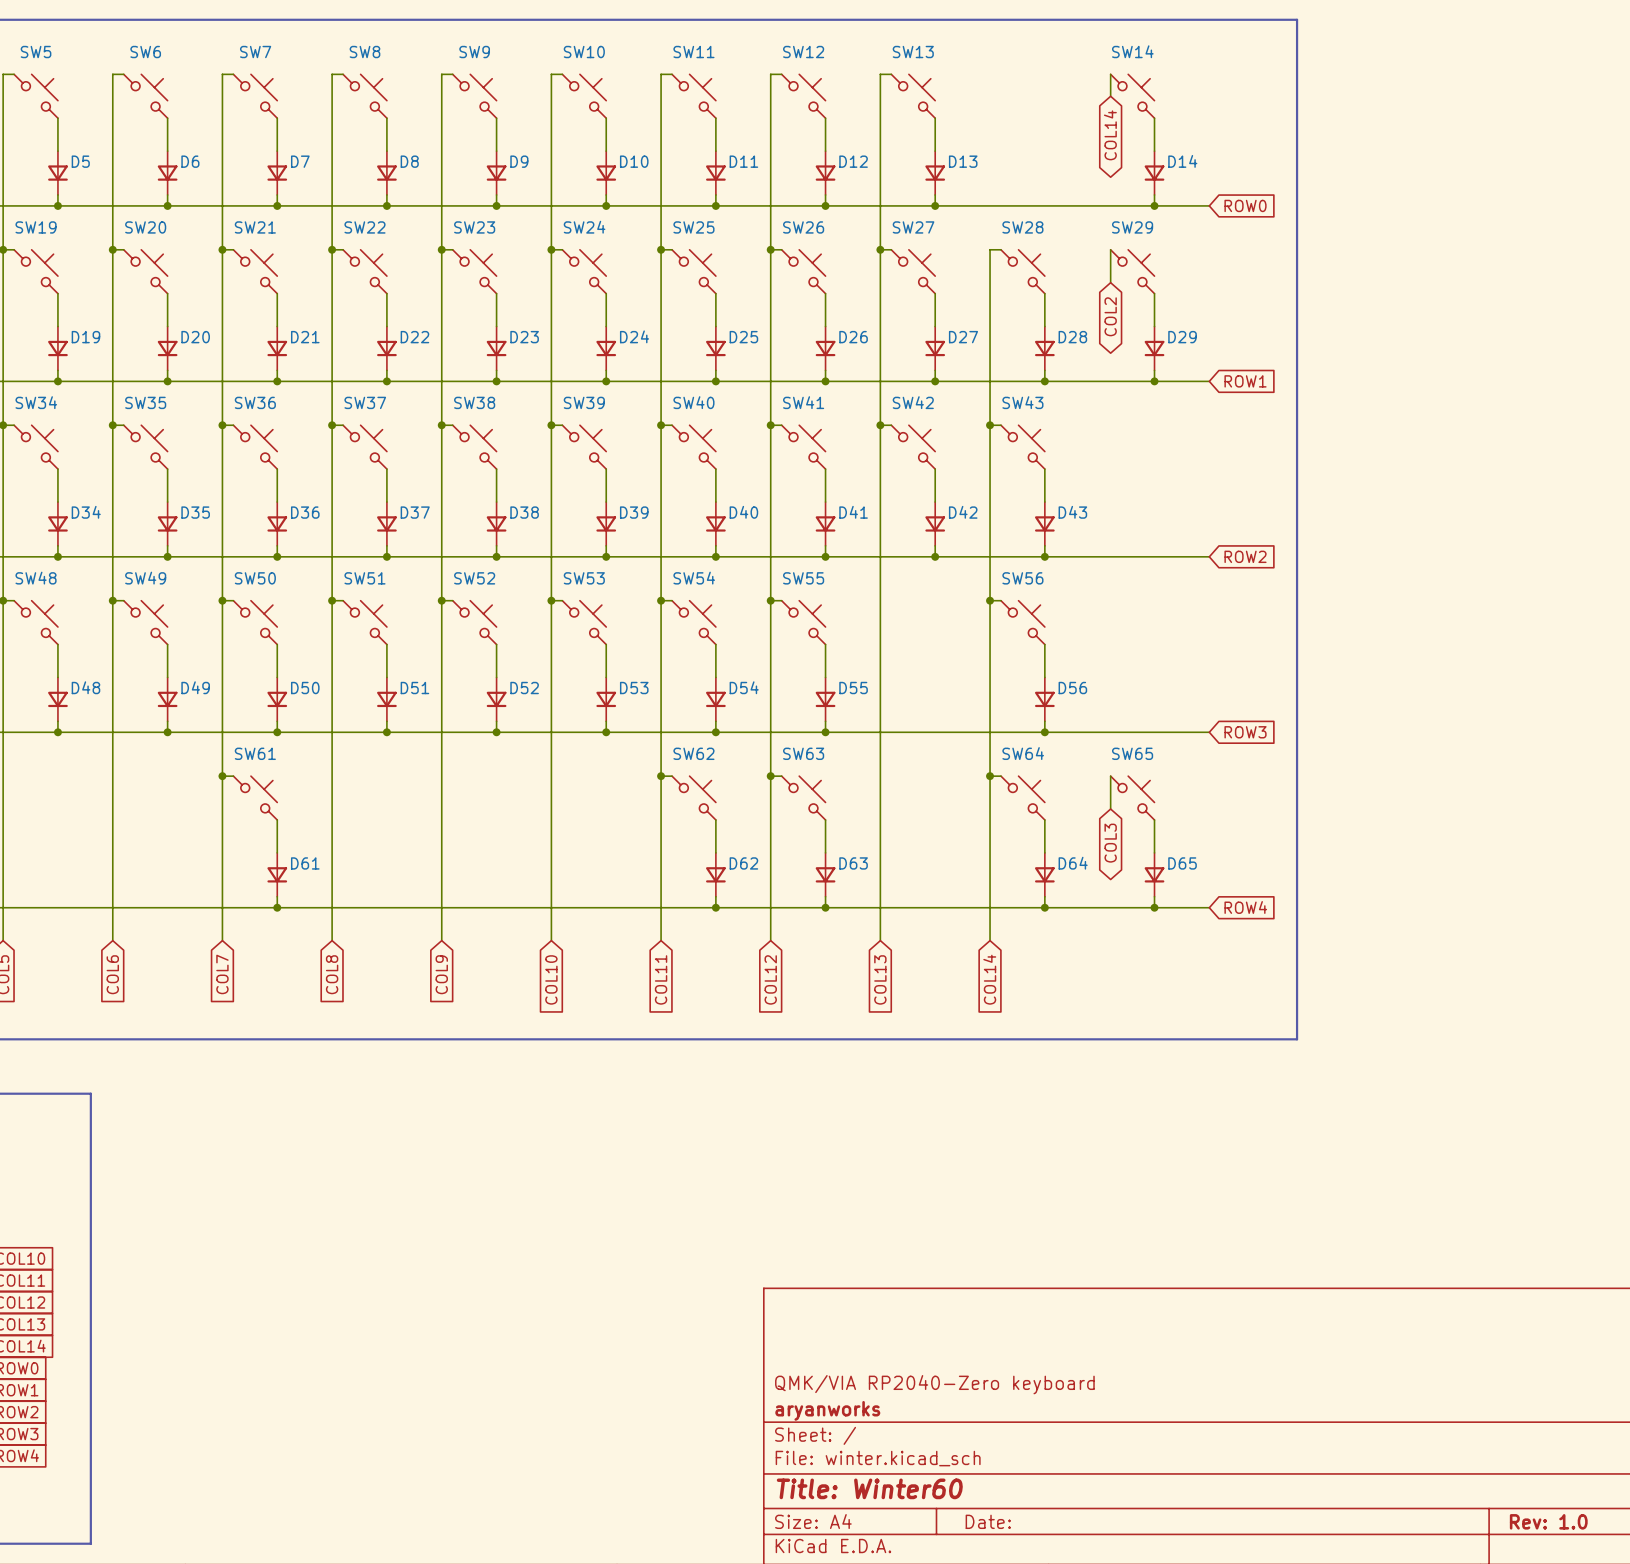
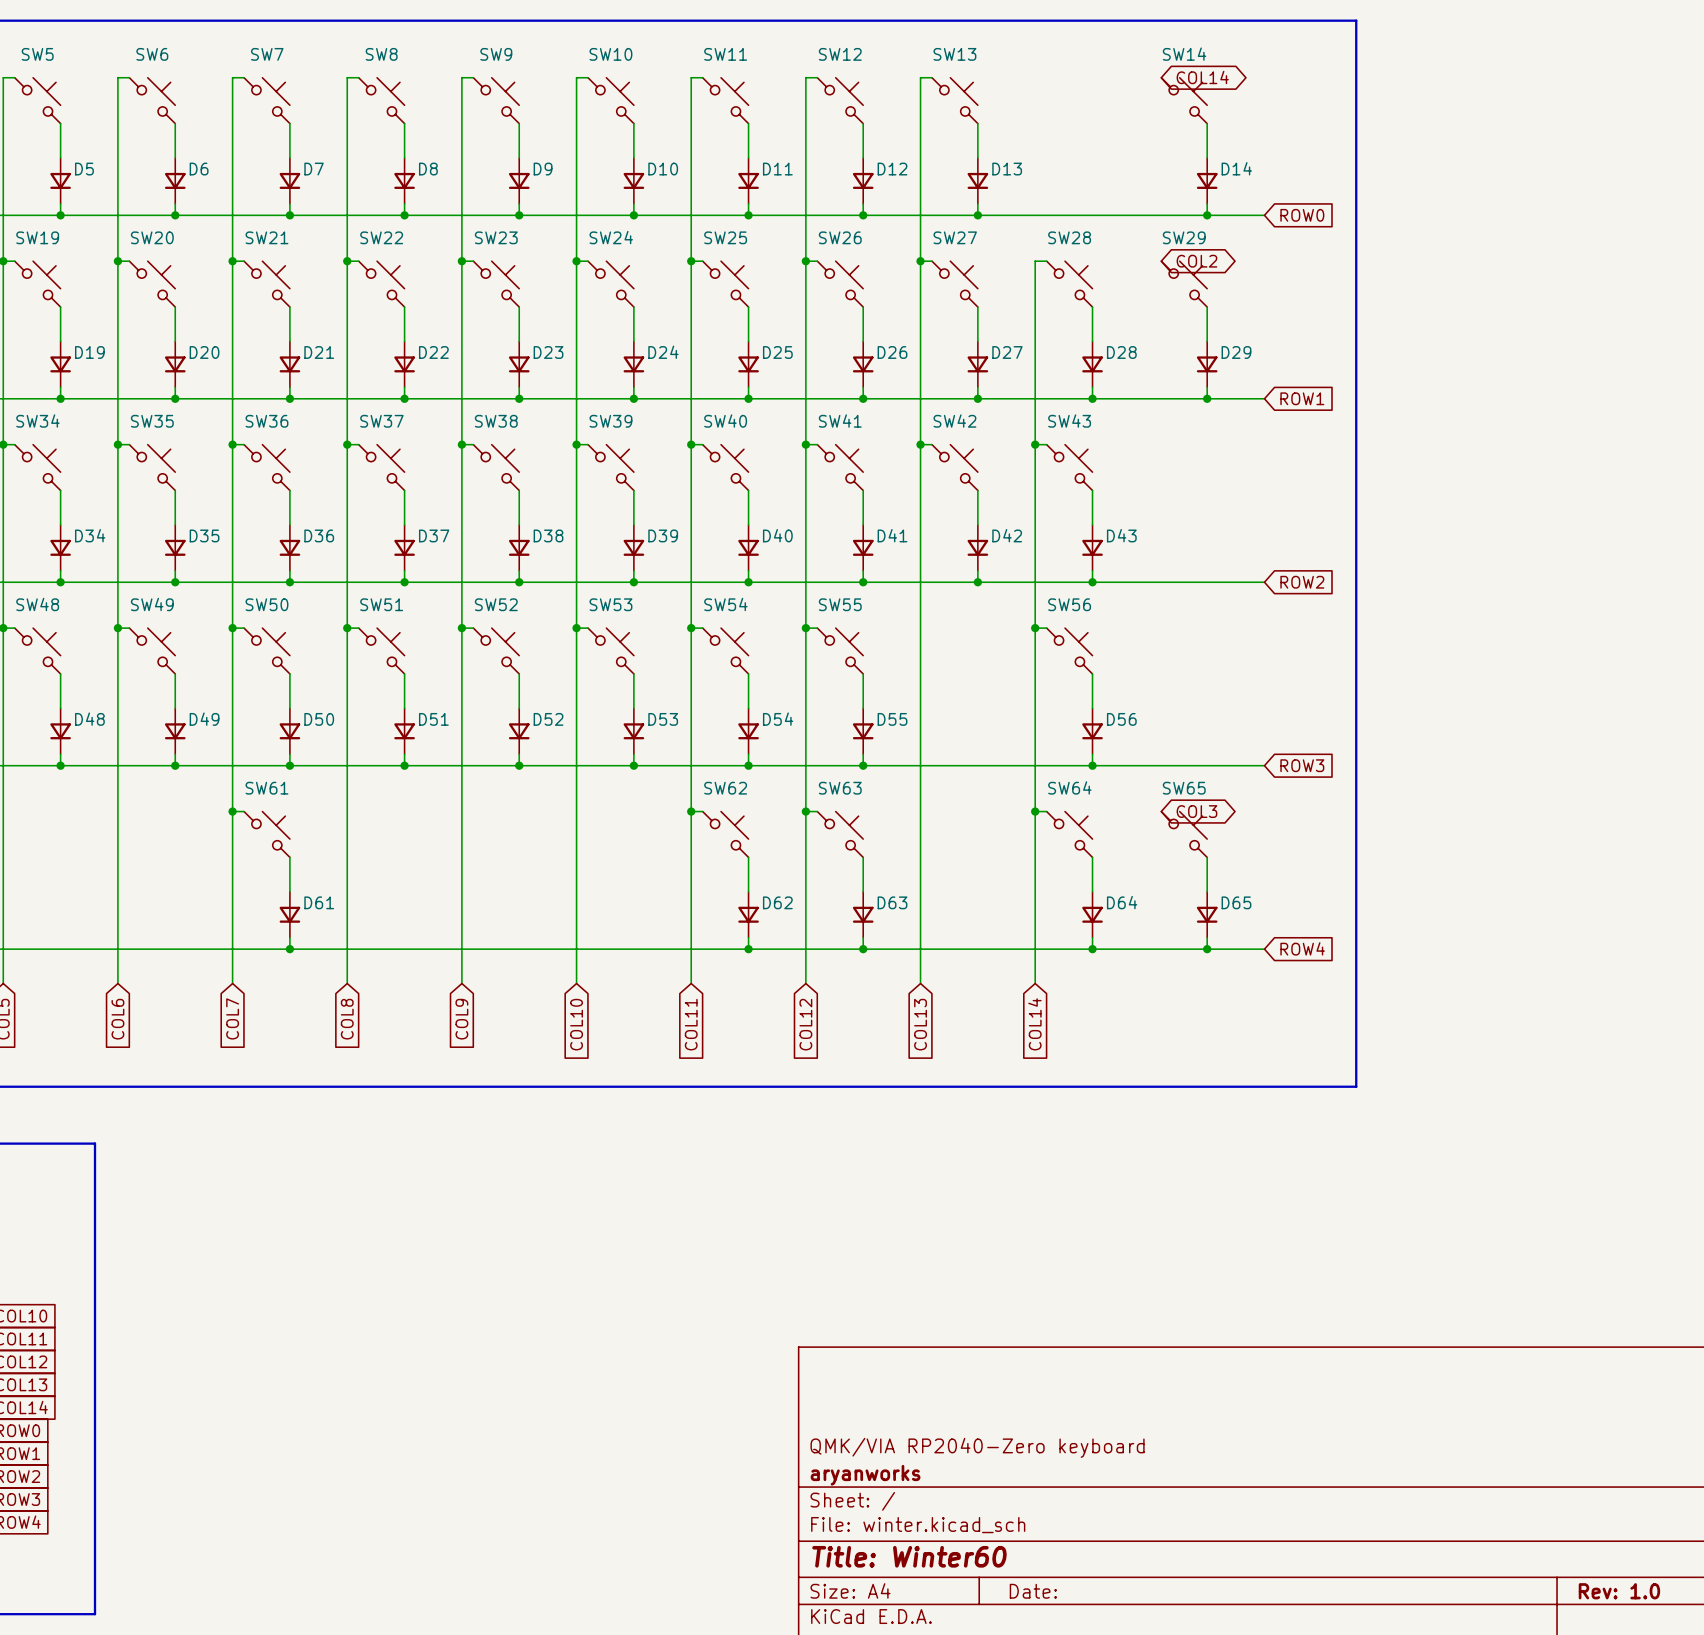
wire: (1110, 74) (1110, 96) -> none
global label rotation: 0° (1110, 135) -> 90° counterclockwise (1202, 77)
wire: (1110, 249) (1110, 282) -> none
global label rotation: 0° (1110, 316) -> 90° counterclockwise (1196, 261)
global label position: COL2 (1110, 316) -> COL2 (1196, 261)
wire: (1110, 776) (1110, 809) -> none
global label rotation: 0° (1110, 843) -> 90° counterclockwise (1196, 811)
global label position: COL3 (1110, 843) -> COL3 (1196, 811)

